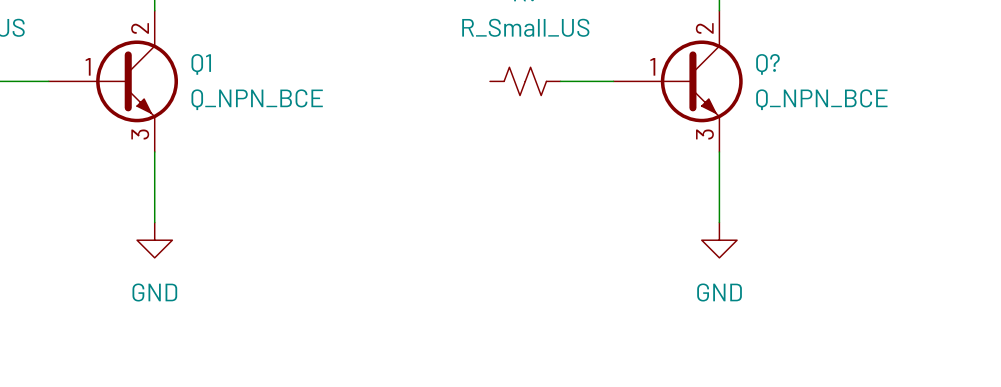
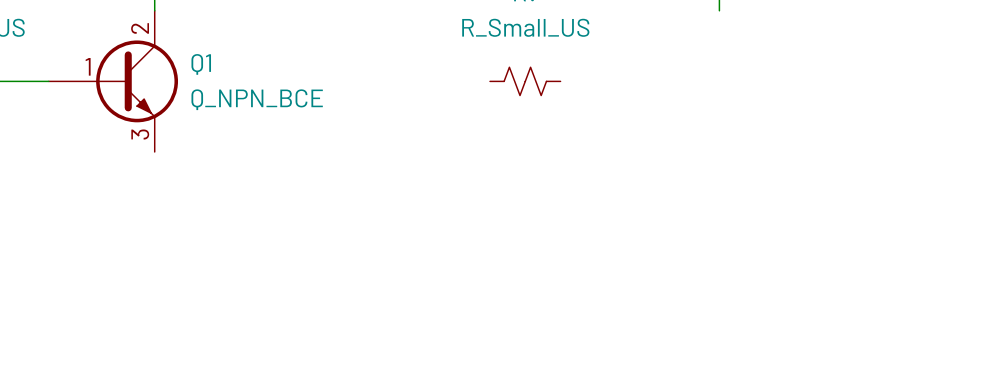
wire: (560, 81) (613, 81) -> none
Q?: Q_NPN_BCE (678, 81) -> none
wire: (154, 151) (154, 222) -> none
wire: (719, 151) (719, 222) -> none
power symbol: GND (154, 240) -> none
power symbol: GND (719, 240) -> none

